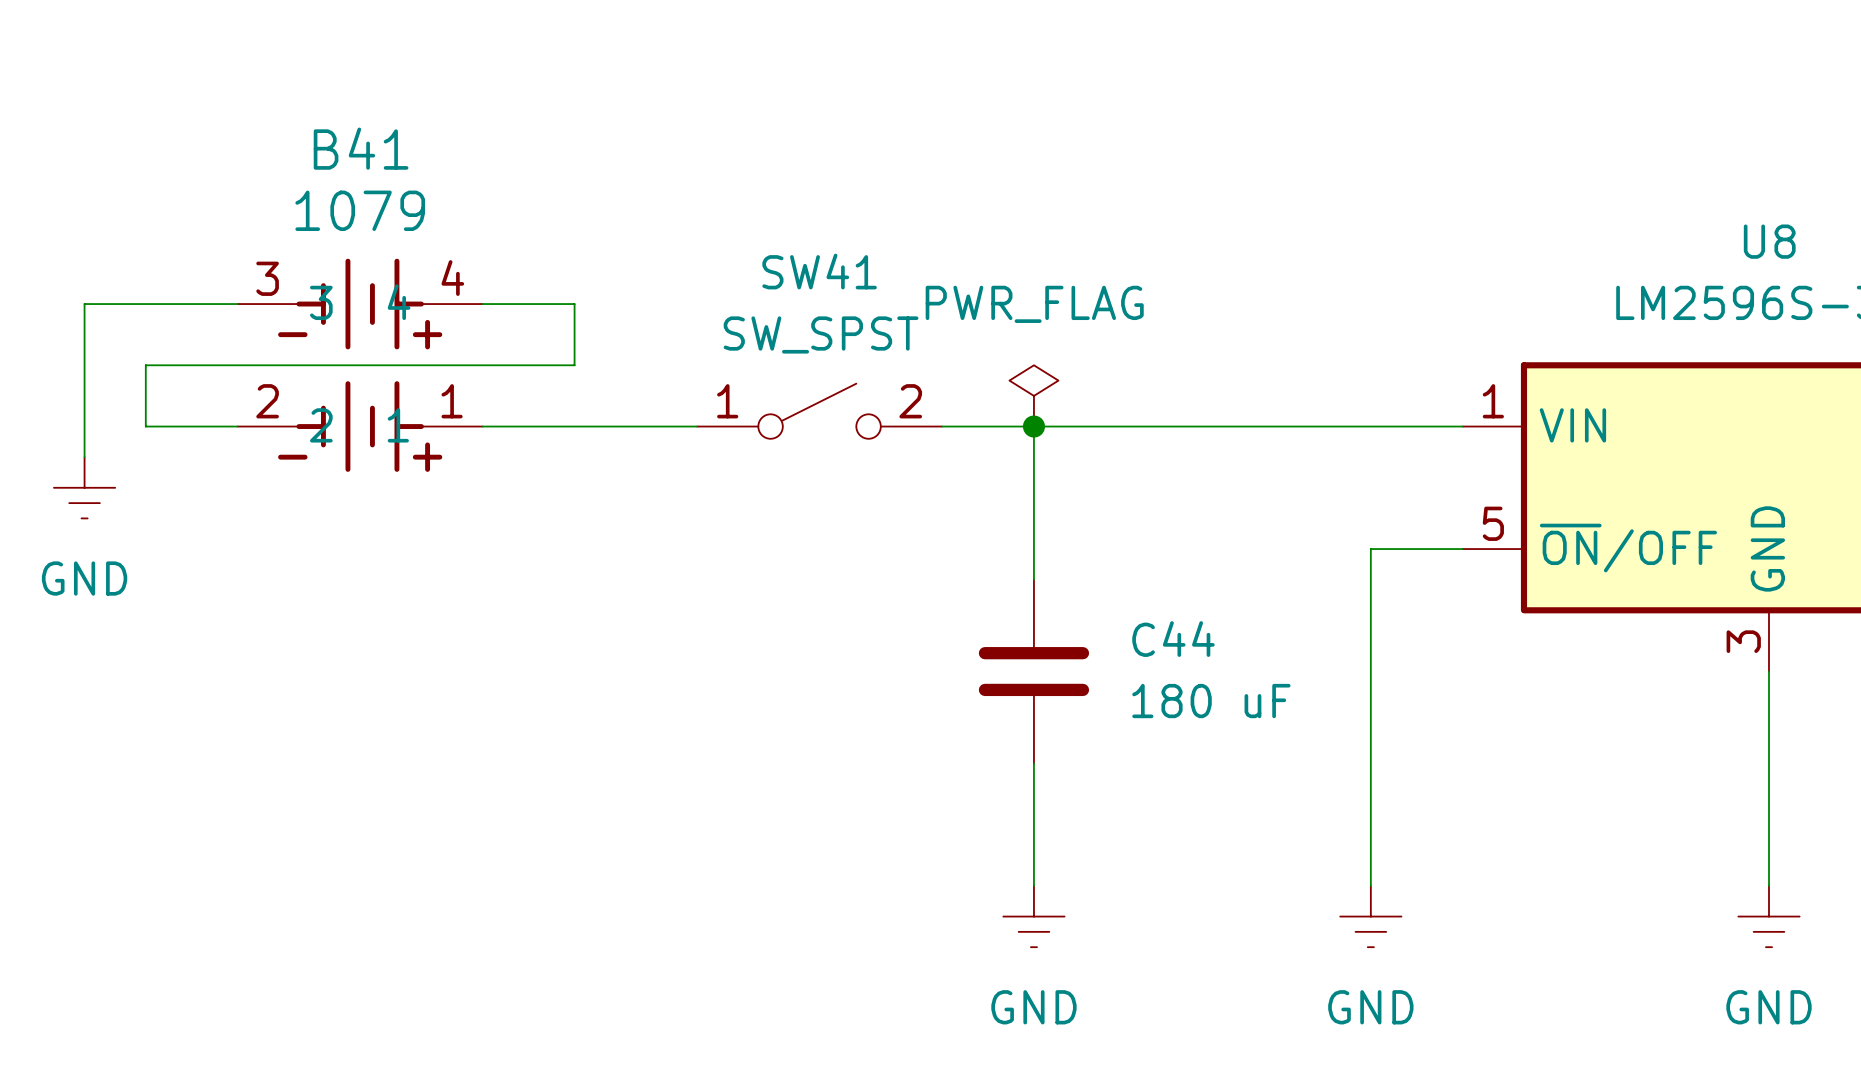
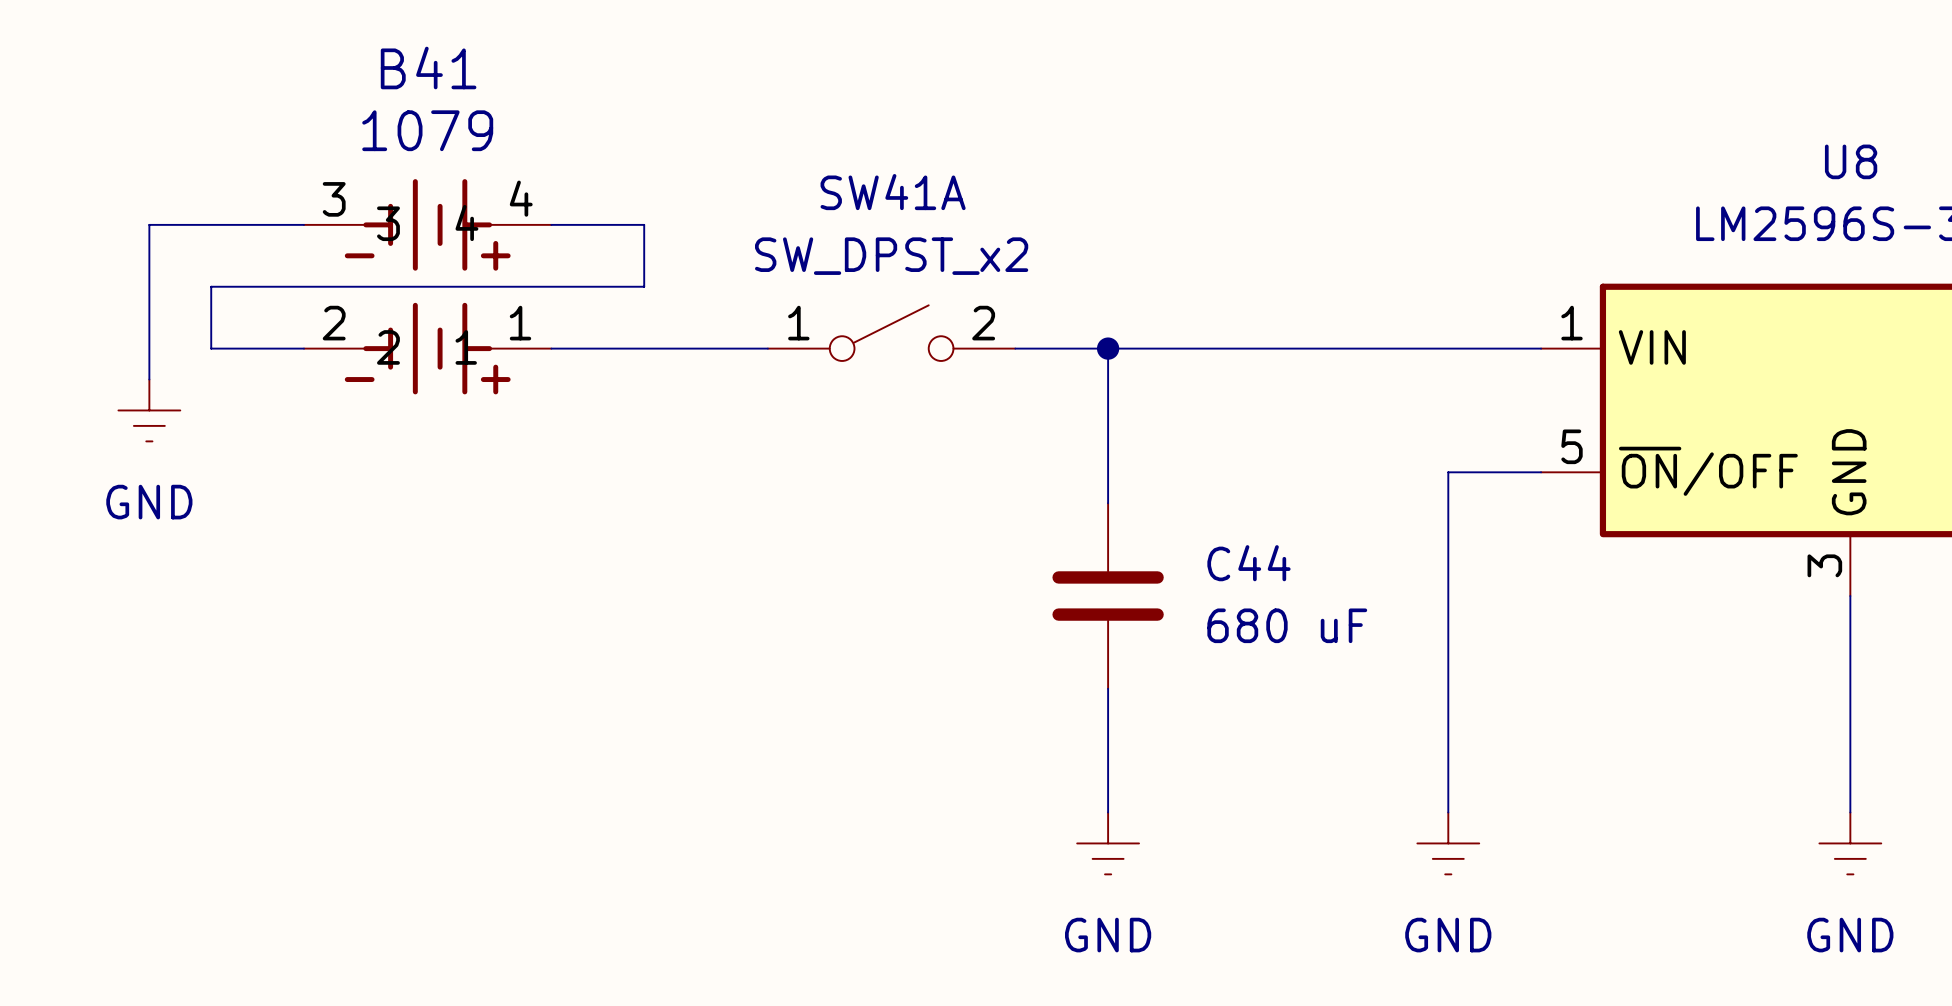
SW41 name: SW41 (819, 271) -> SW41A (893, 192)
SW41 value: SW_SPST (821, 334) -> SW_DPST_x2 (891, 256)
power symbol: PWR_FLAG (1033, 395) -> none
C44 value: 180 uF (1211, 701) -> 680 uF (1287, 625)

